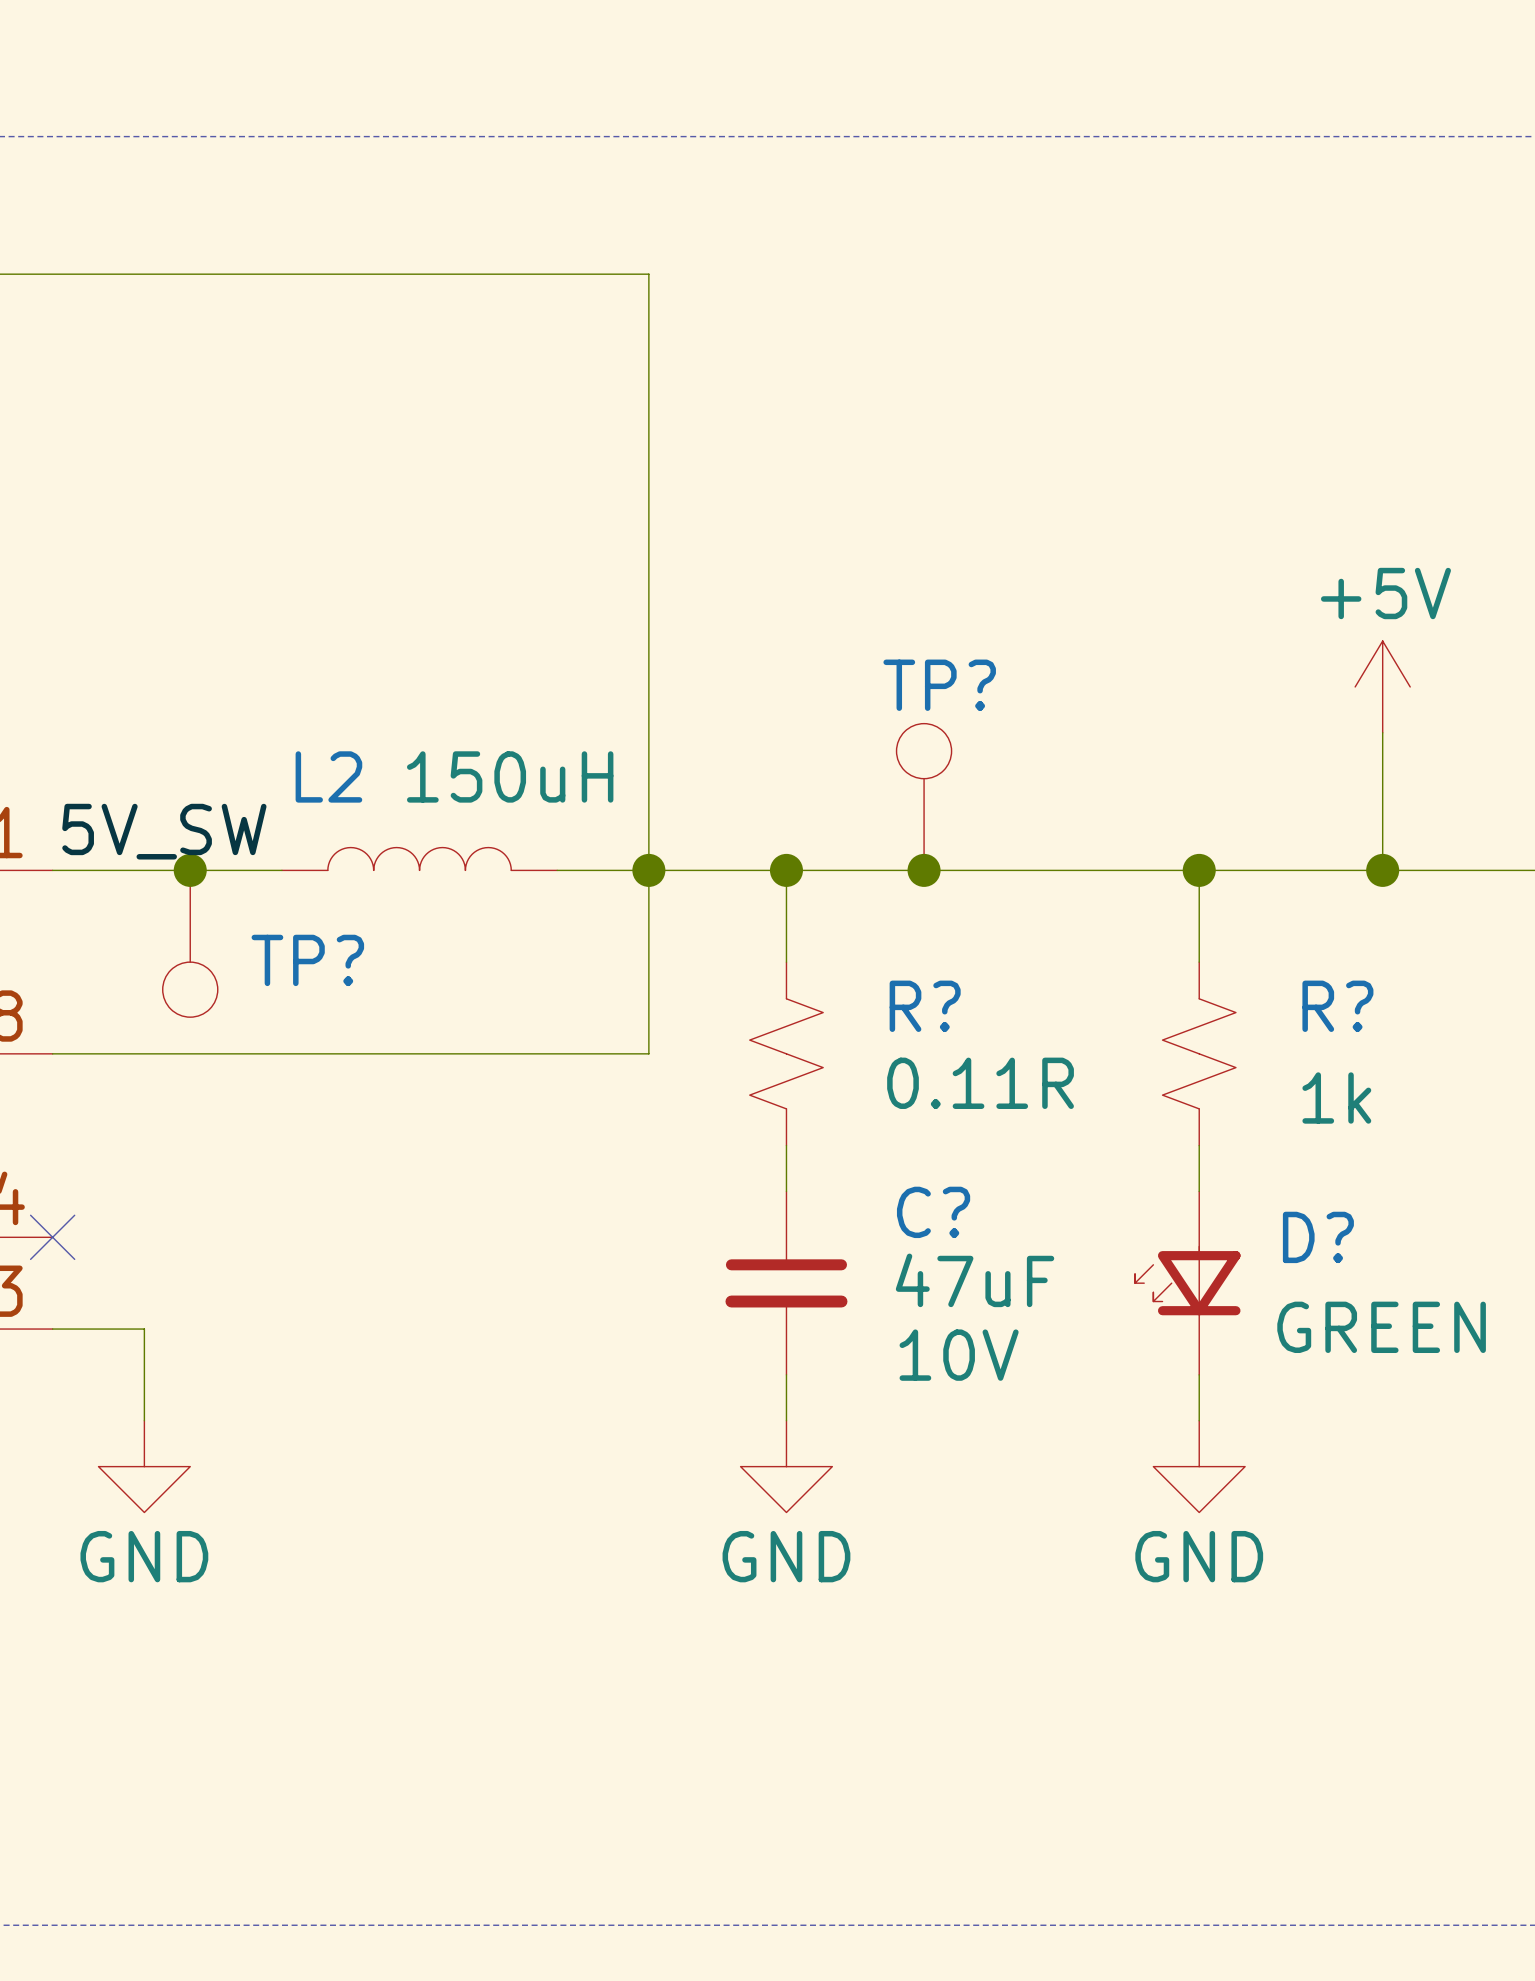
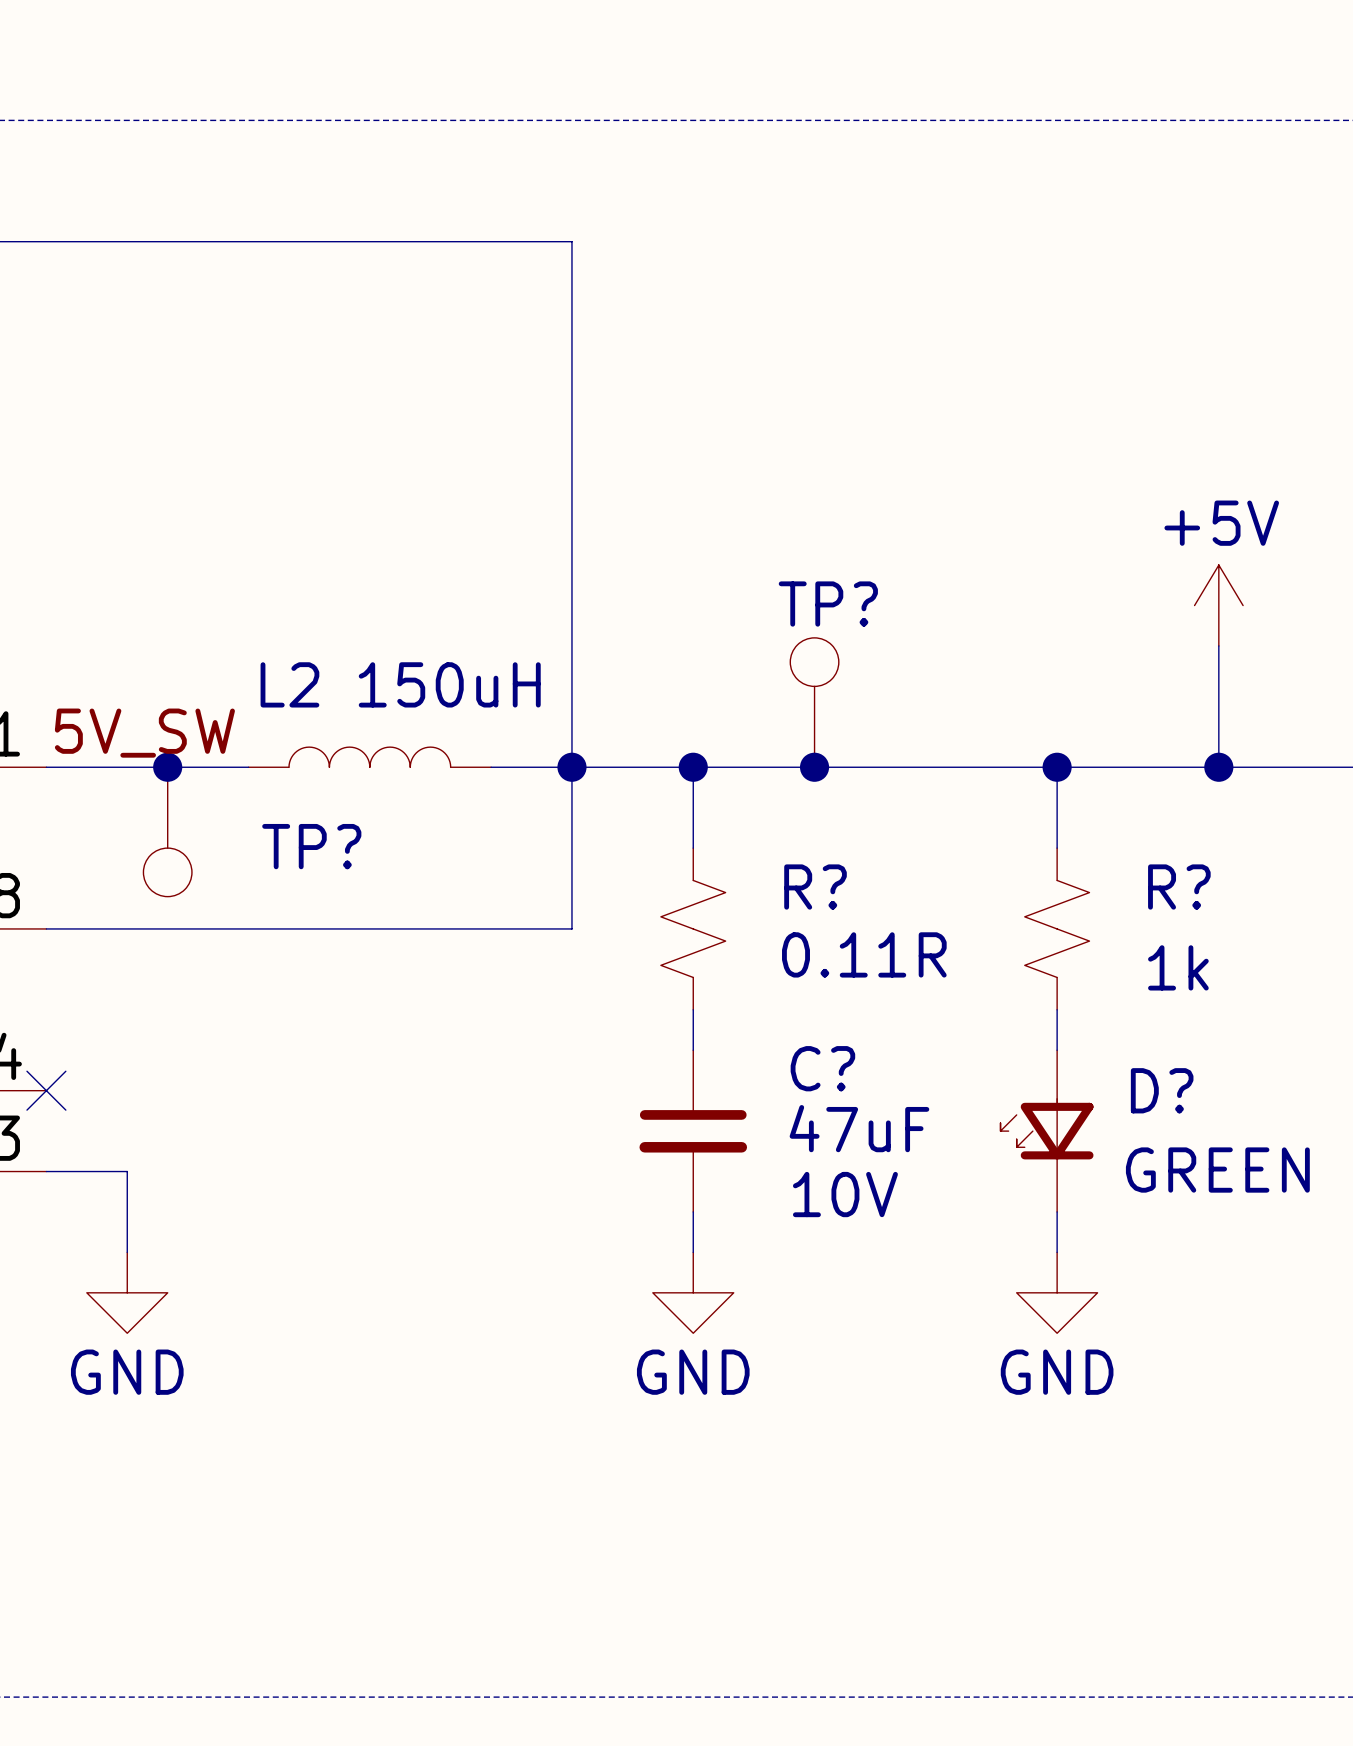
TP? name position: TP? (307, 960) -> TP? (311, 846)

